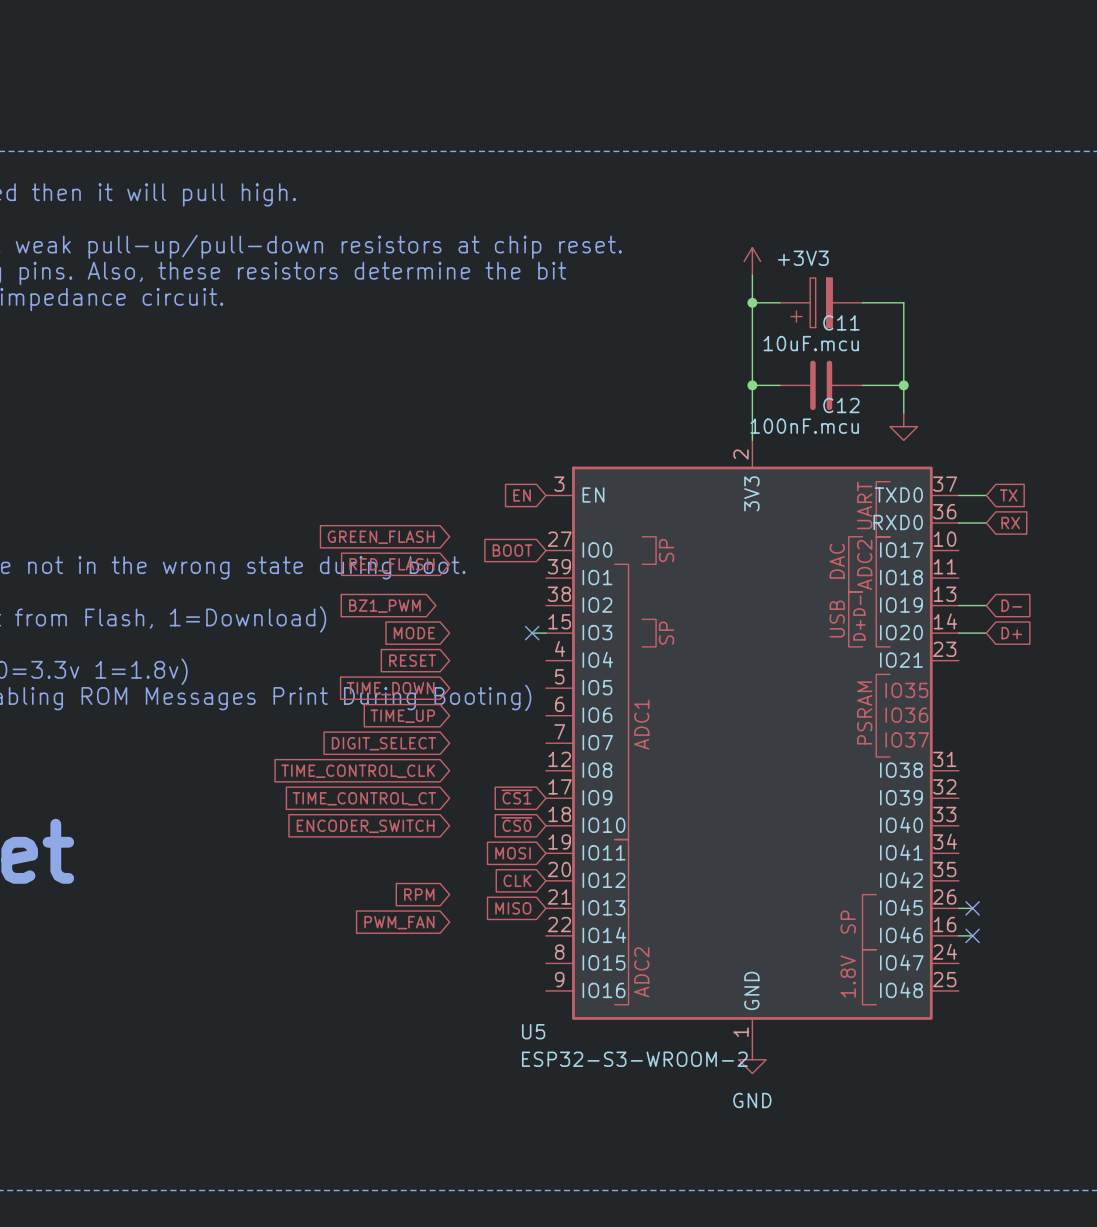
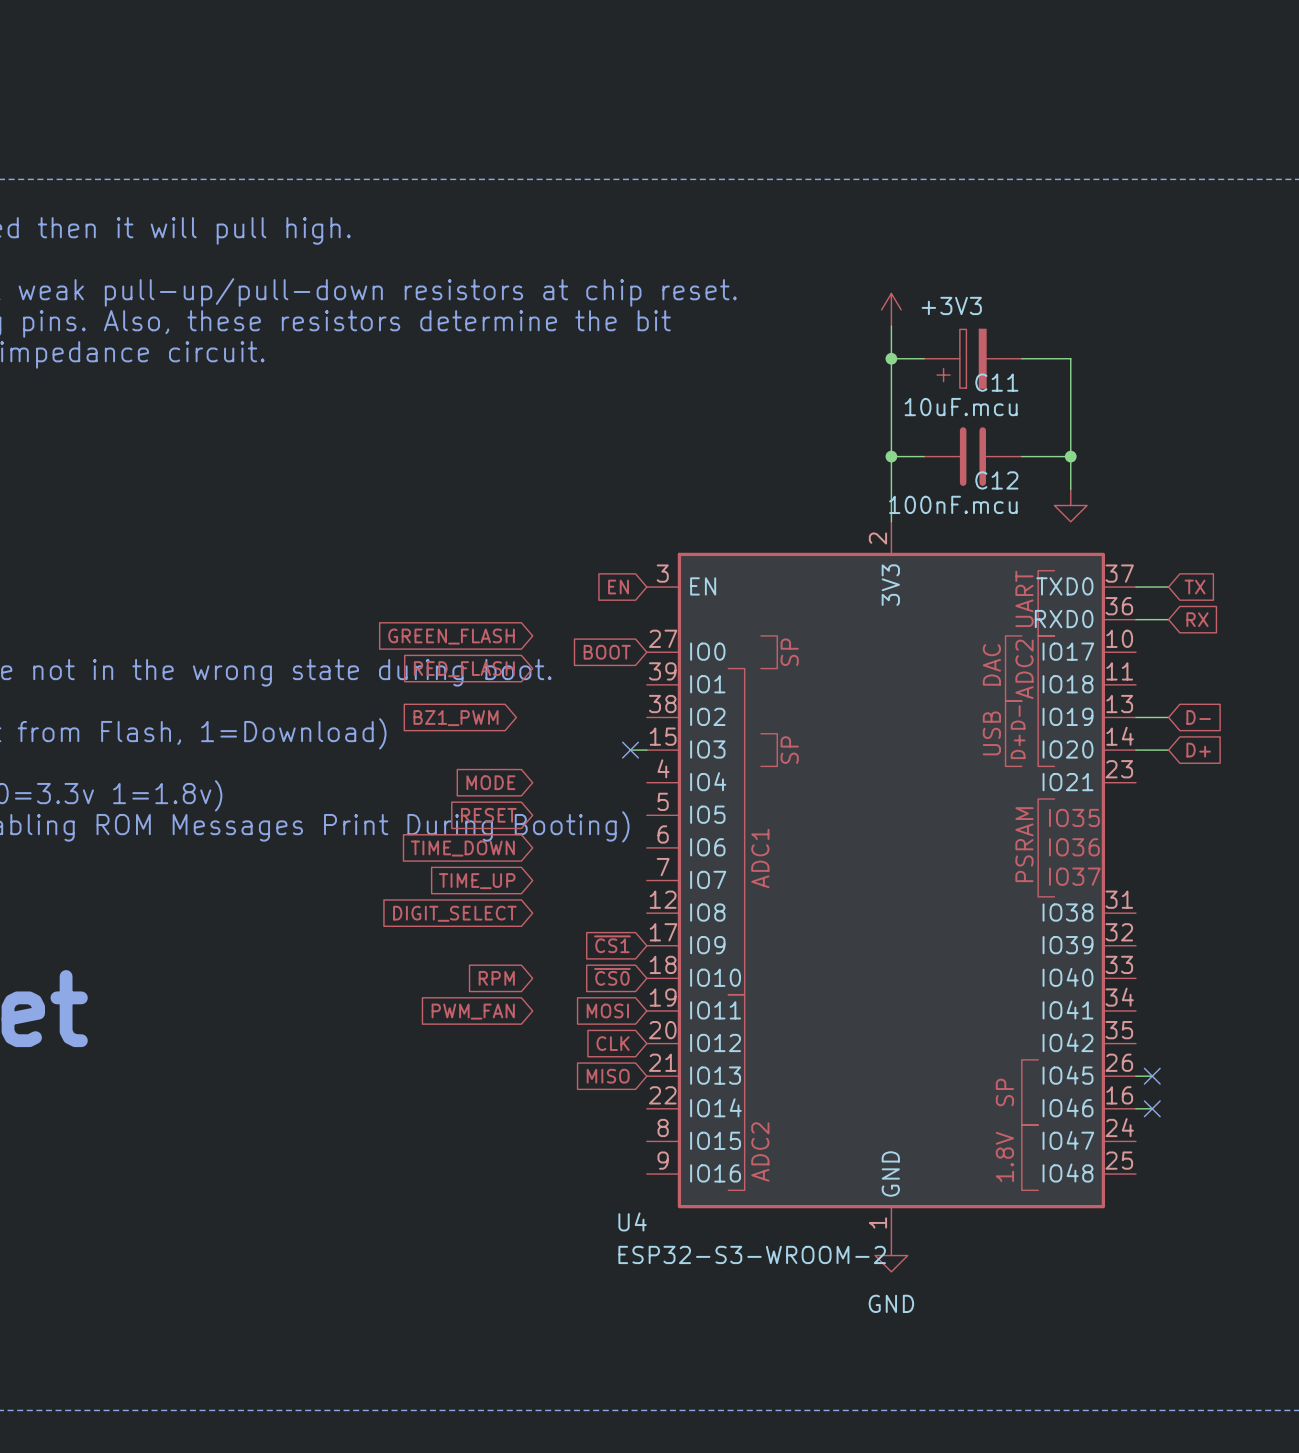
global label: MODE (414, 633) -> none
global label: RESET (412, 660) -> MODE (490, 782)
global label: TIME_DOWN (390, 688) -> RESET (488, 815)
global label: TIME_UP (402, 716) -> TIME_DOWN (462, 848)
global label: DIGIT_SELECT (383, 743) -> TIME_UP (477, 881)
global label: TIME_CONTROL_CLK (358, 771) -> DIGIT_SELECT (454, 913)
global label: TIME_CONTROL_CT (364, 798) -> none
global label: ENCODER_SWITCH (365, 826) -> RPM (496, 978)
global label: RPM (419, 894) -> none
global label position: PWM_FAN (399, 922) -> PWM_FAN (473, 1011)
U5 name: U5 (533, 1031) -> U4 (632, 1221)

